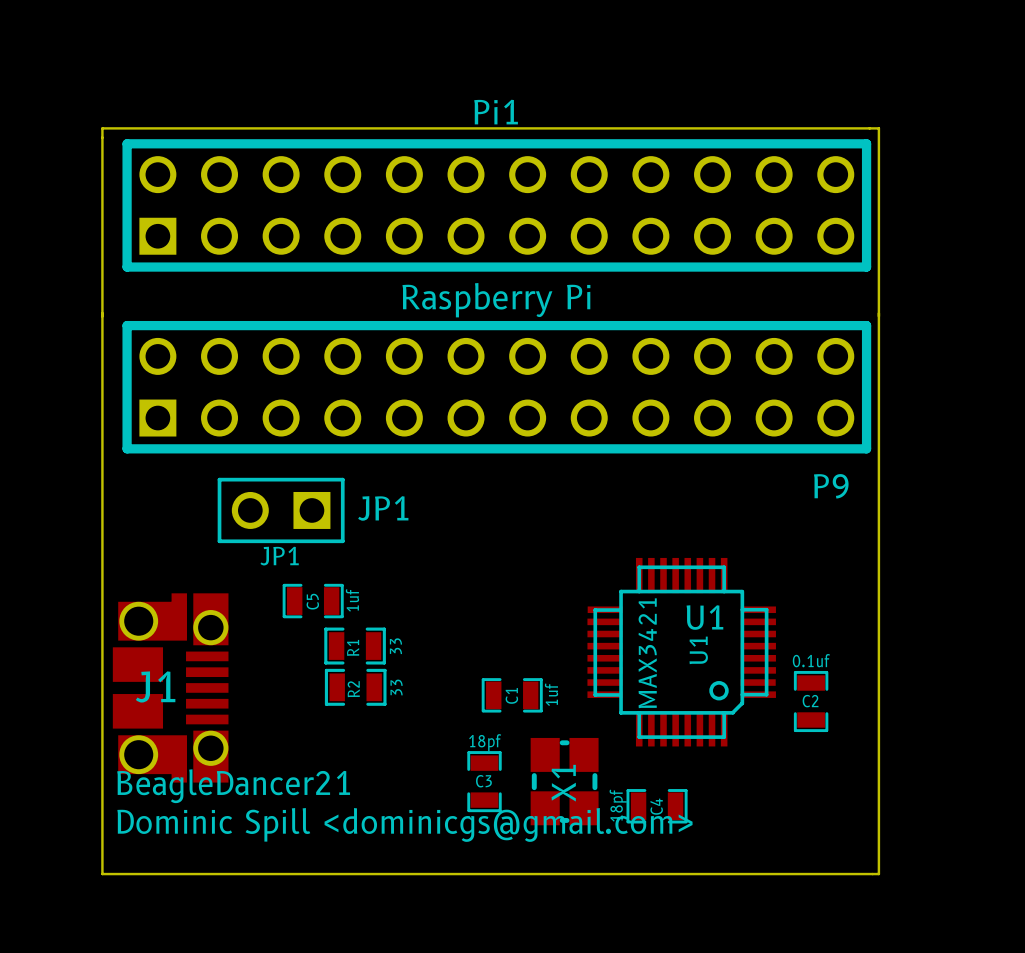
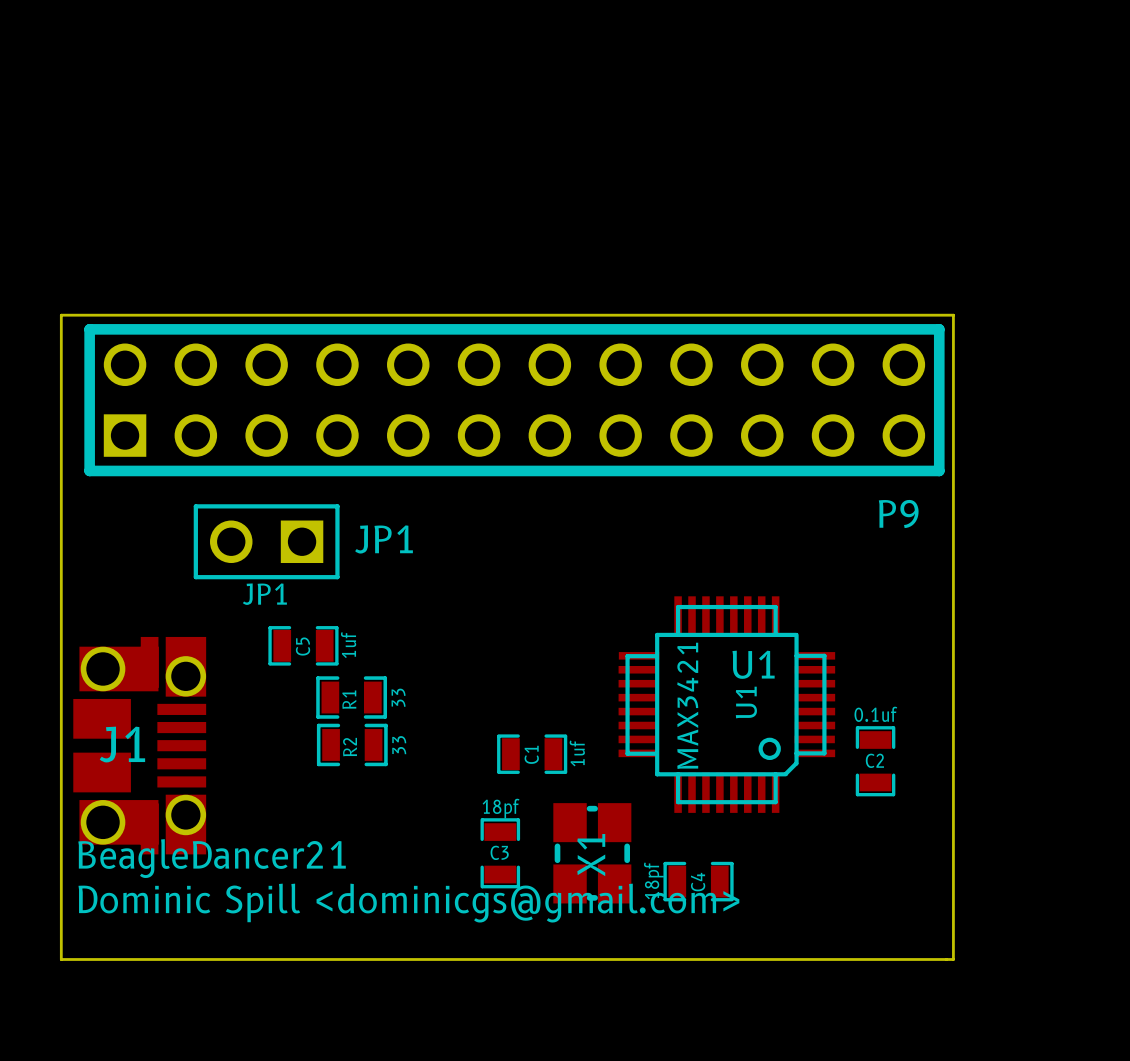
Pi1: Raspberry Pi (496, 205) -> none
board edge: (102, 313) (102, 128) (878, 128) (878, 313) -> (61, 315) (953, 315)

